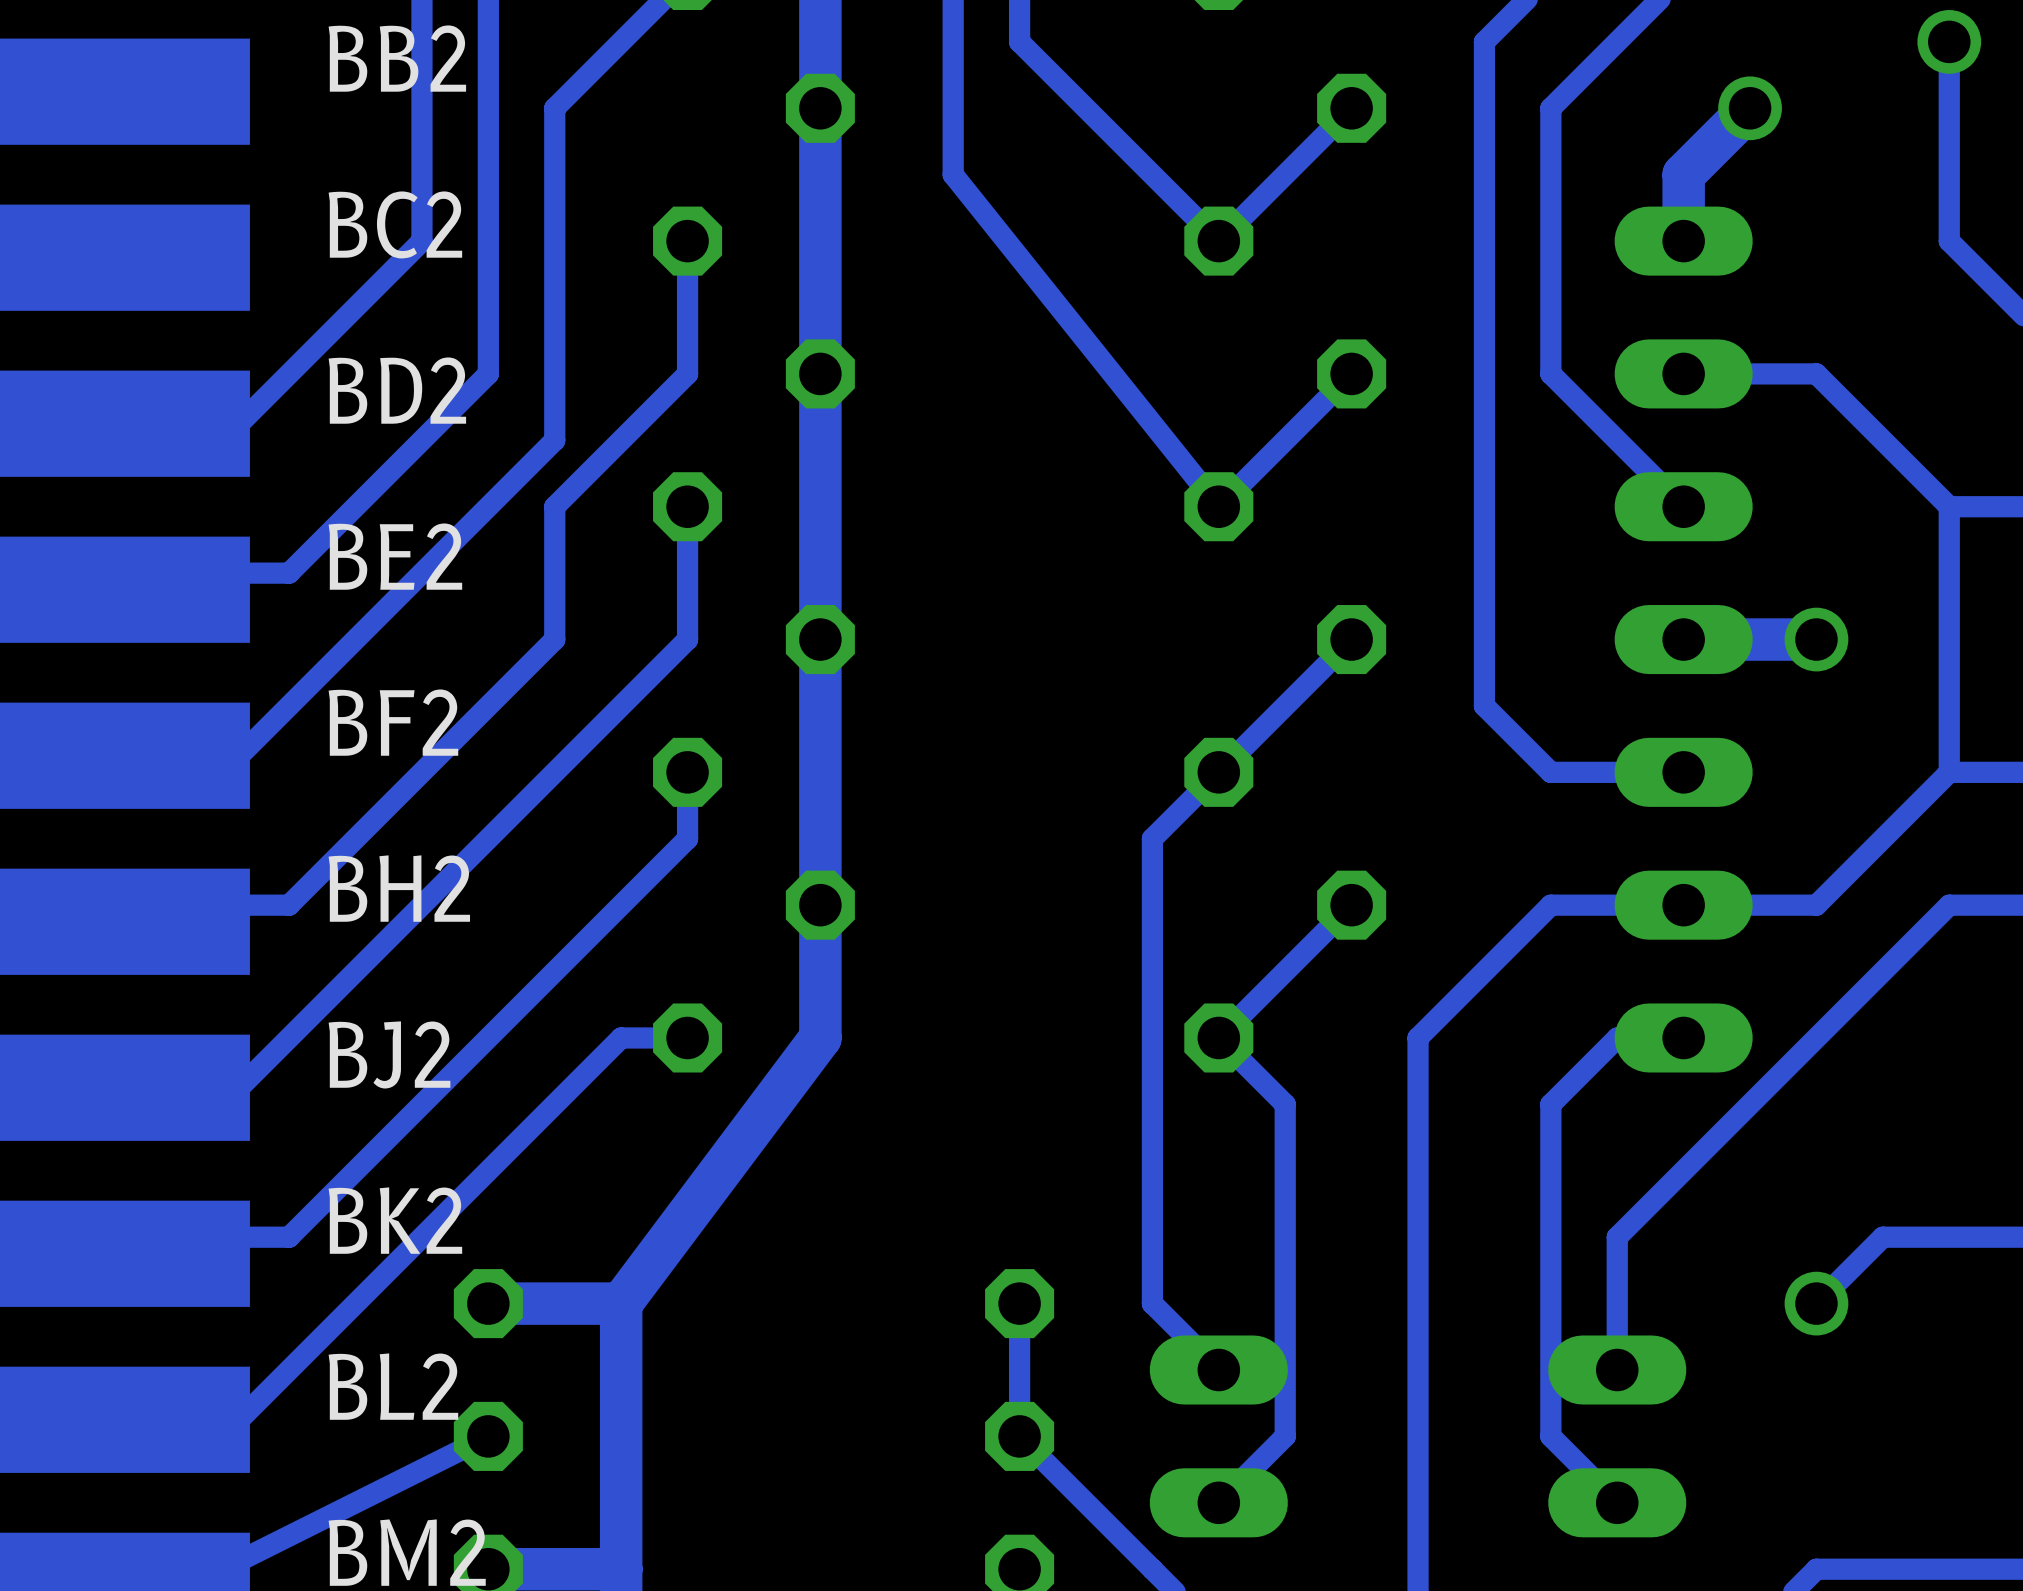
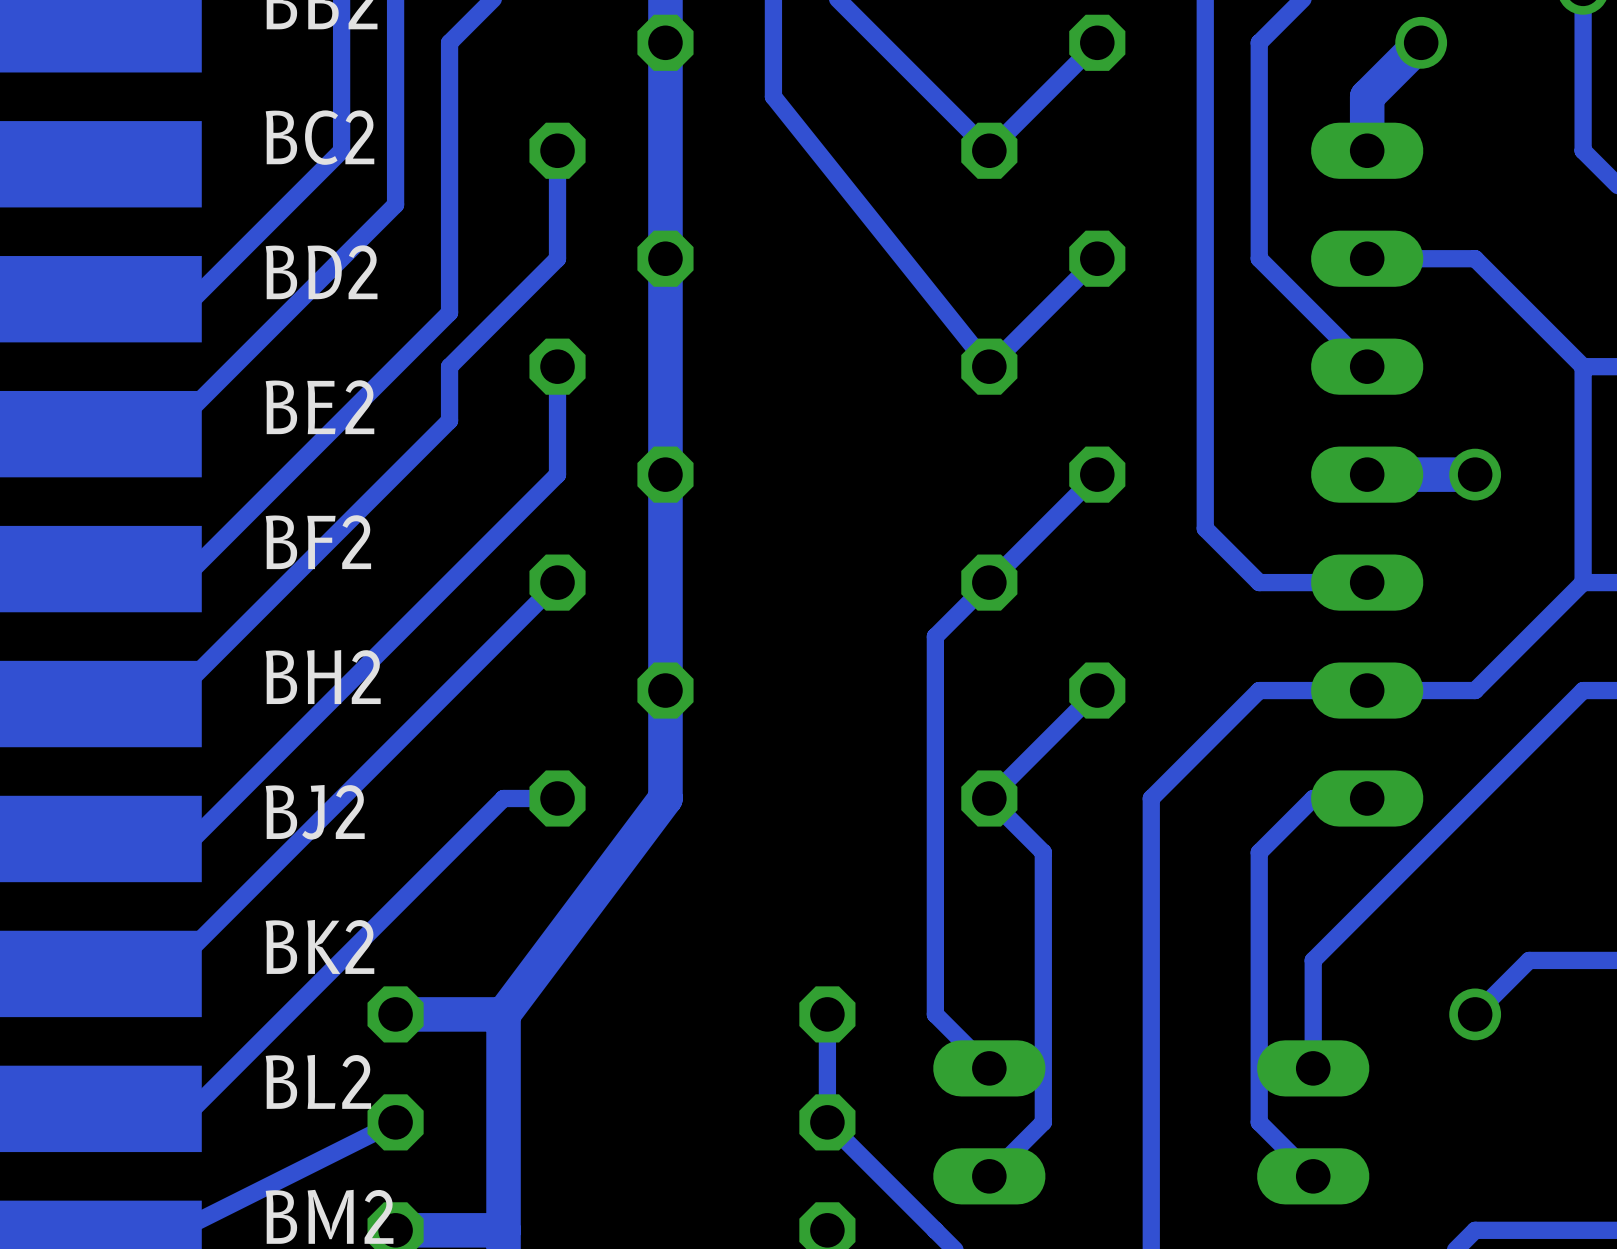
track: (488, 307) (488, 373) (289, 573) (222, 573) -> (395, 204) (179, 420)
track: (554, 573) (554, 639) (289, 905) (222, 905) -> (449, 420) (179, 690)
track: (687, 772) (687, 838) (289, 1237) (222, 1237) -> (557, 582) (179, 960)

